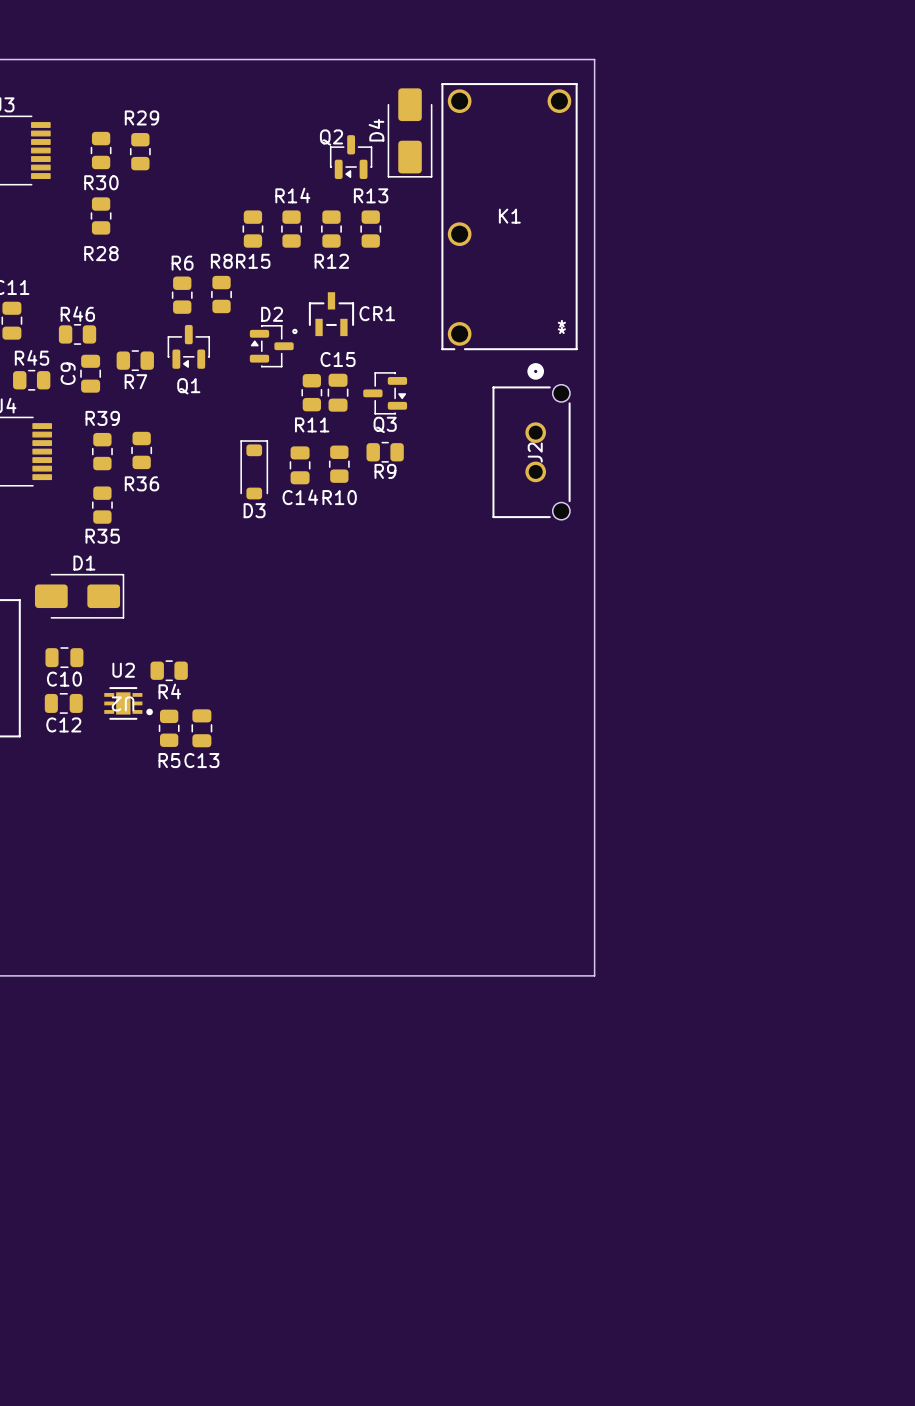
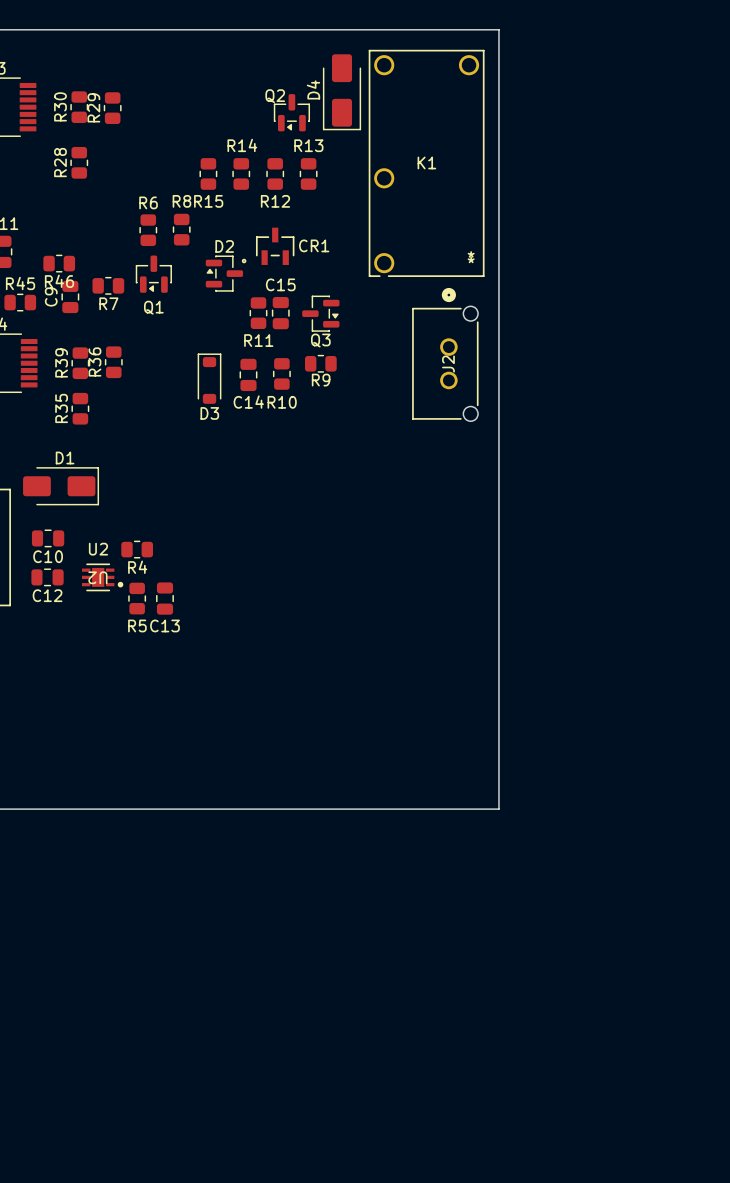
R29 name rotation: 0° (141, 117) -> 90° counterclockwise (93, 107)
R30 name rotation: 0° (101, 182) -> 90° counterclockwise (60, 106)
R28 name rotation: 0° (101, 253) -> 90° counterclockwise (60, 162)
R46 name position: R46 (77, 314) -> R46 (59, 281)
R39 name rotation: 0° (102, 418) -> 90° counterclockwise (61, 362)
R36 name rotation: 0° (141, 483) -> 90° counterclockwise (94, 361)
R35 name rotation: 0° (102, 536) -> 90° counterclockwise (61, 408)

